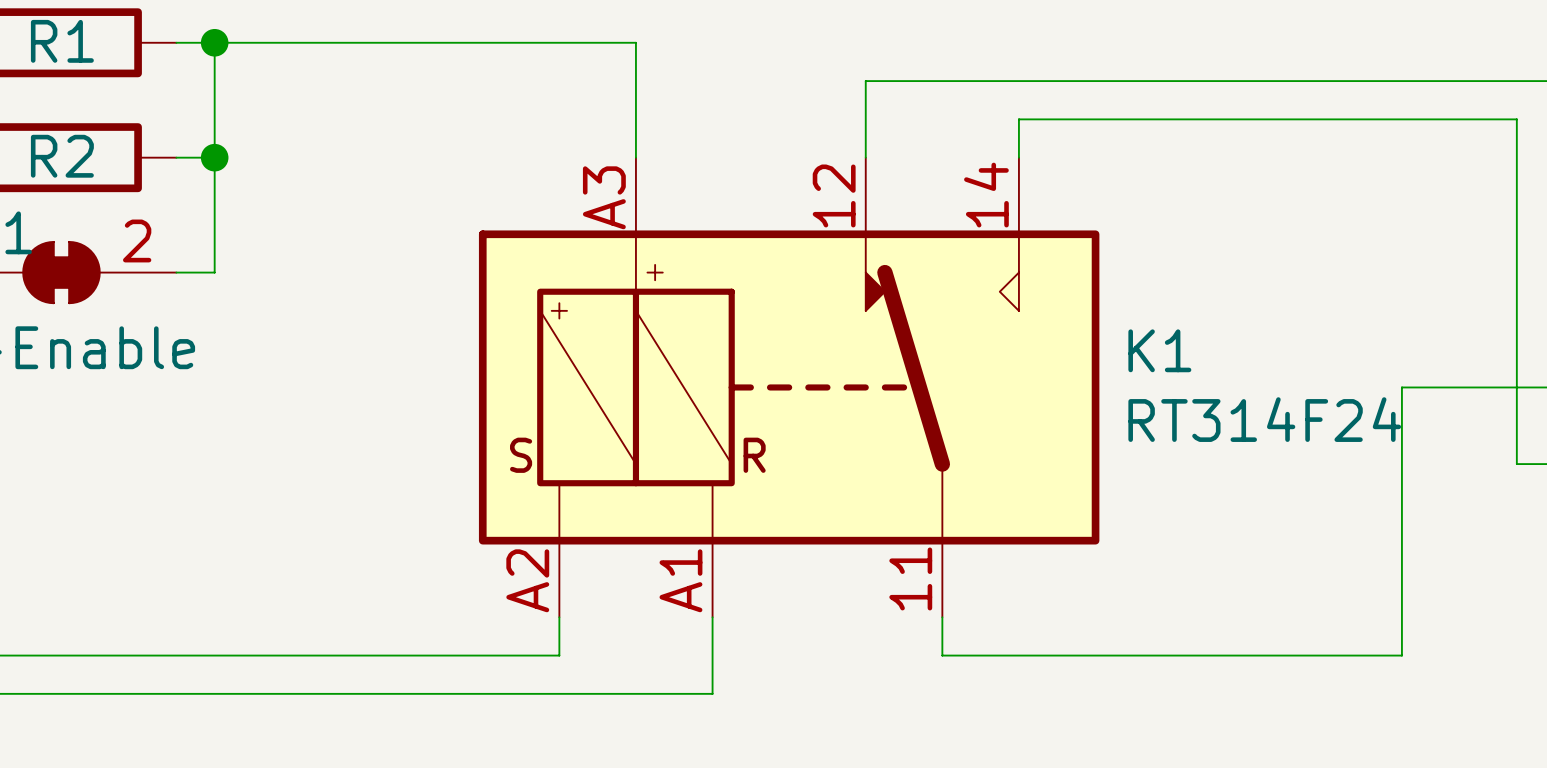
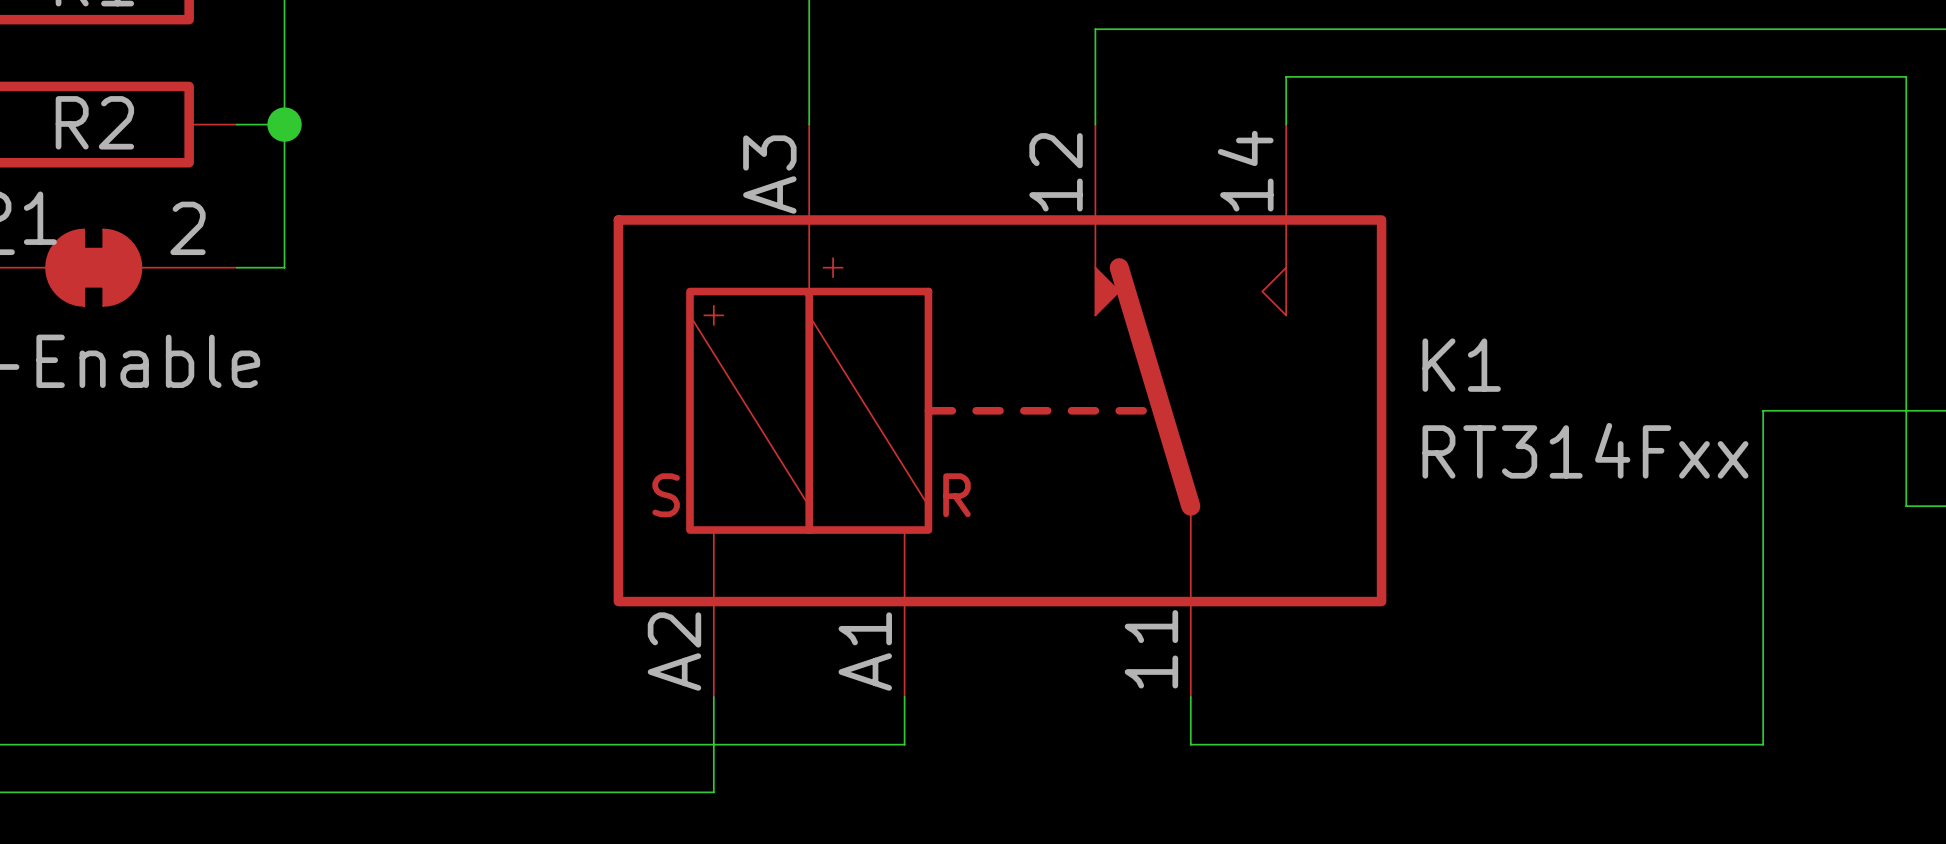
K1 value: RT314F24 (1264, 419) -> RT314Fxx (1585, 450)
wire: (712, 655) (712, 693) (559, 693) -> (904, 744) (713, 744) (713, 792)

